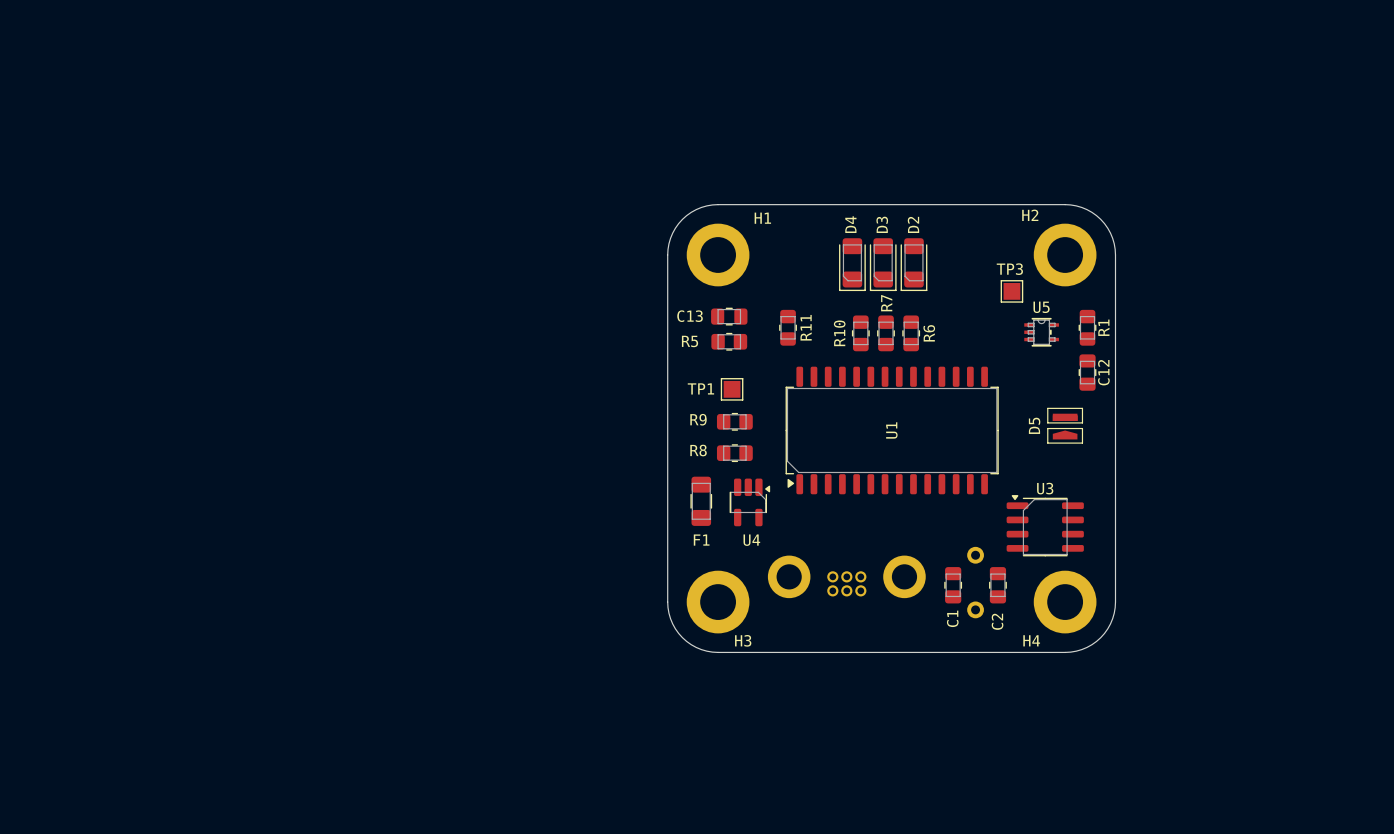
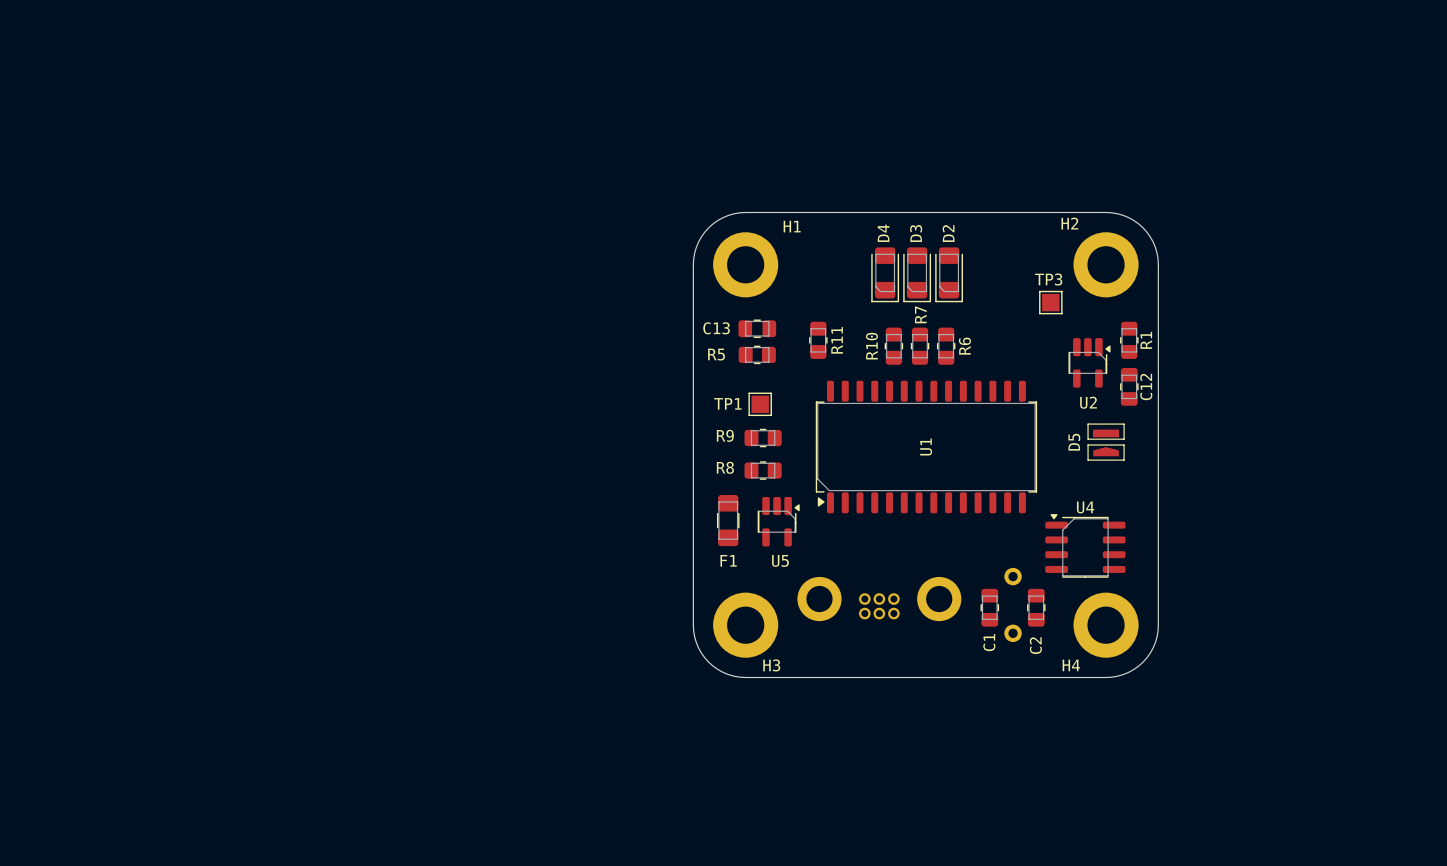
U5: (1041, 332) -> none
U2: none -> (1089, 362)
U3 name: U3 (1045, 488) -> U4 (1085, 507)
U4 name: U4 (751, 540) -> U5 (780, 560)

